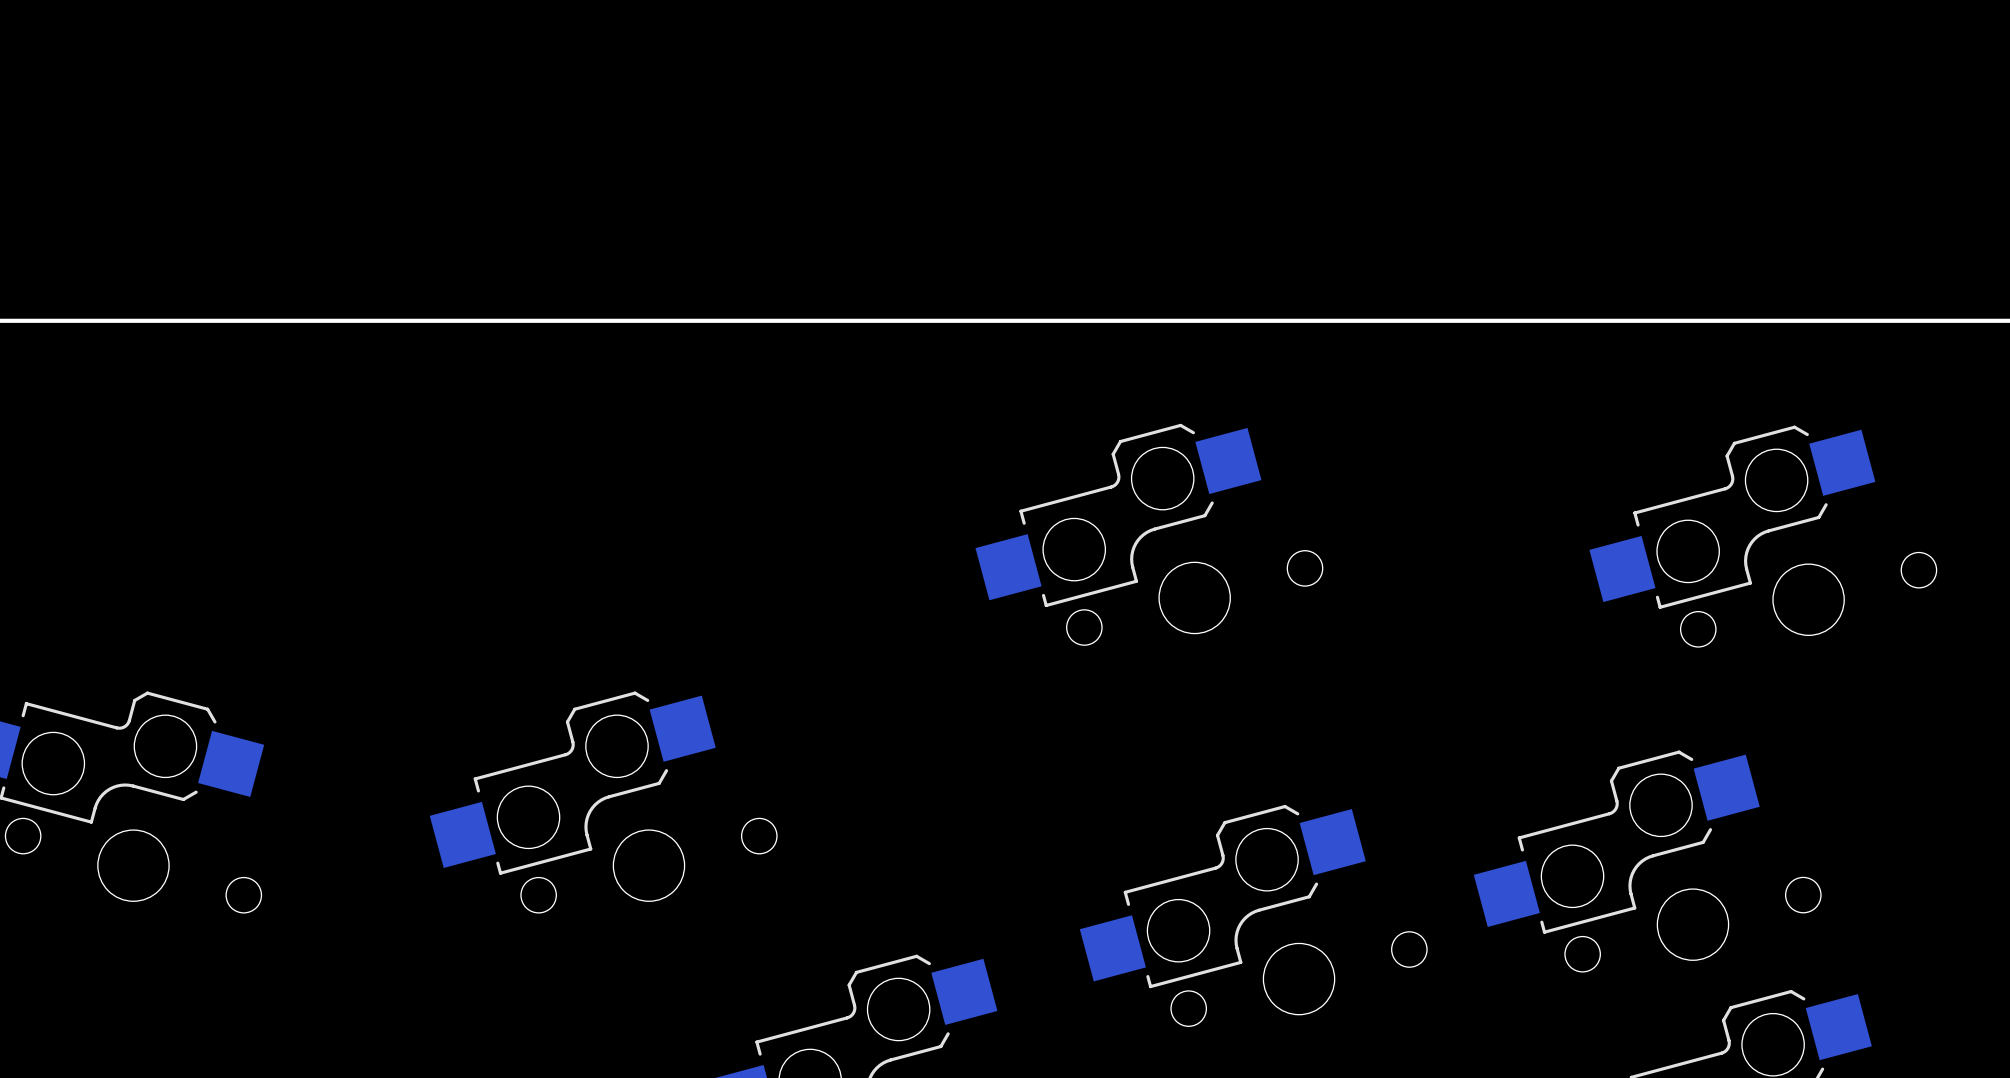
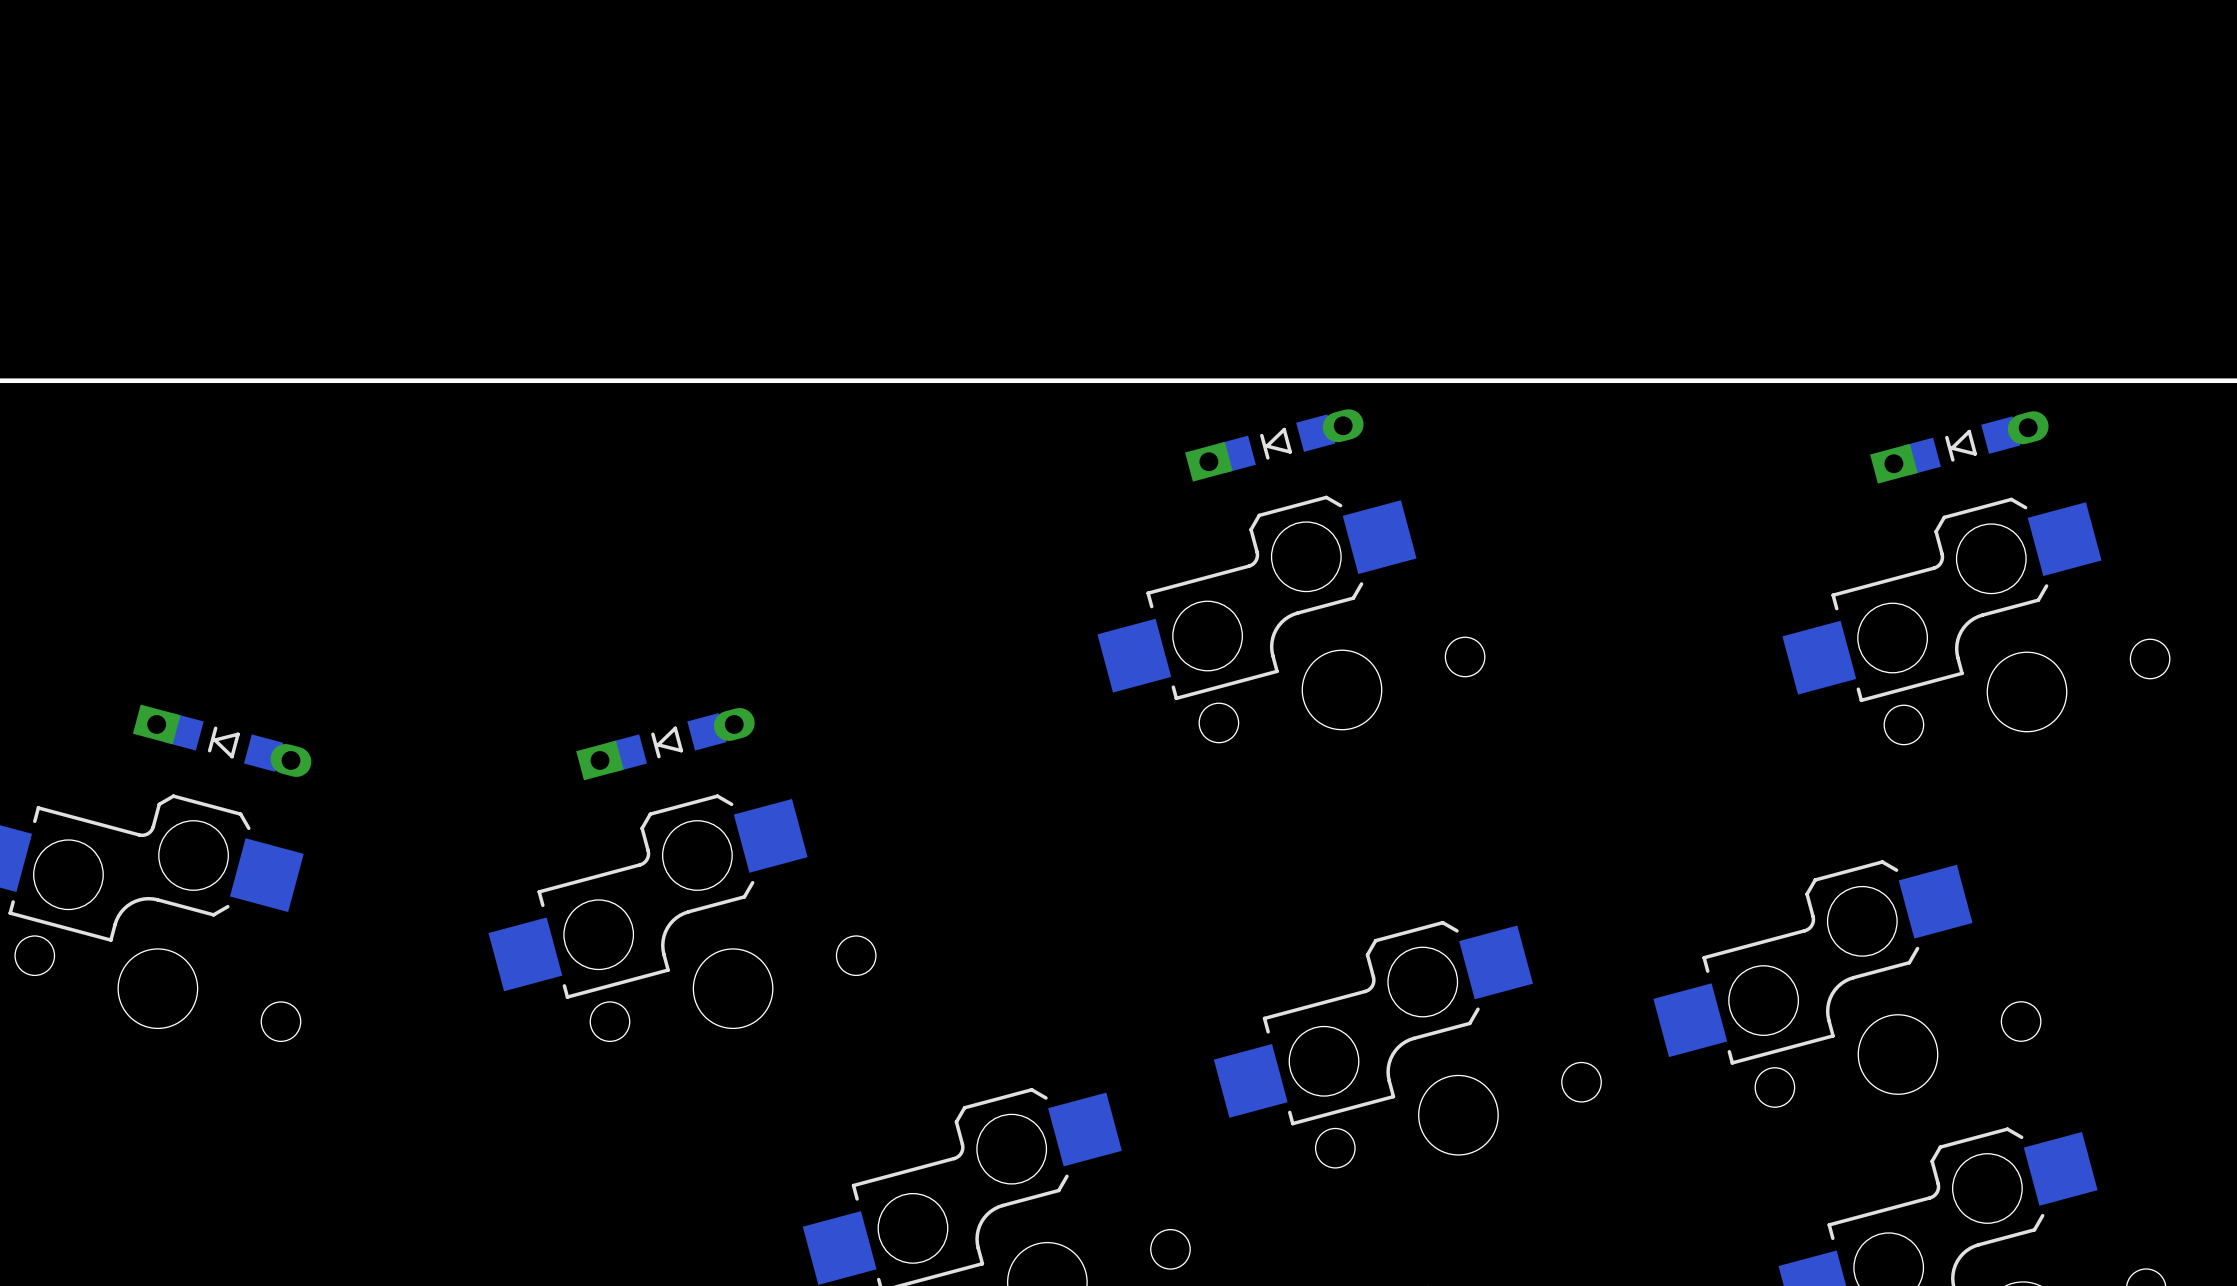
part: none -> (1274, 445)
part: none -> (1959, 447)
part: none -> (222, 740)
part: none -> (665, 744)

